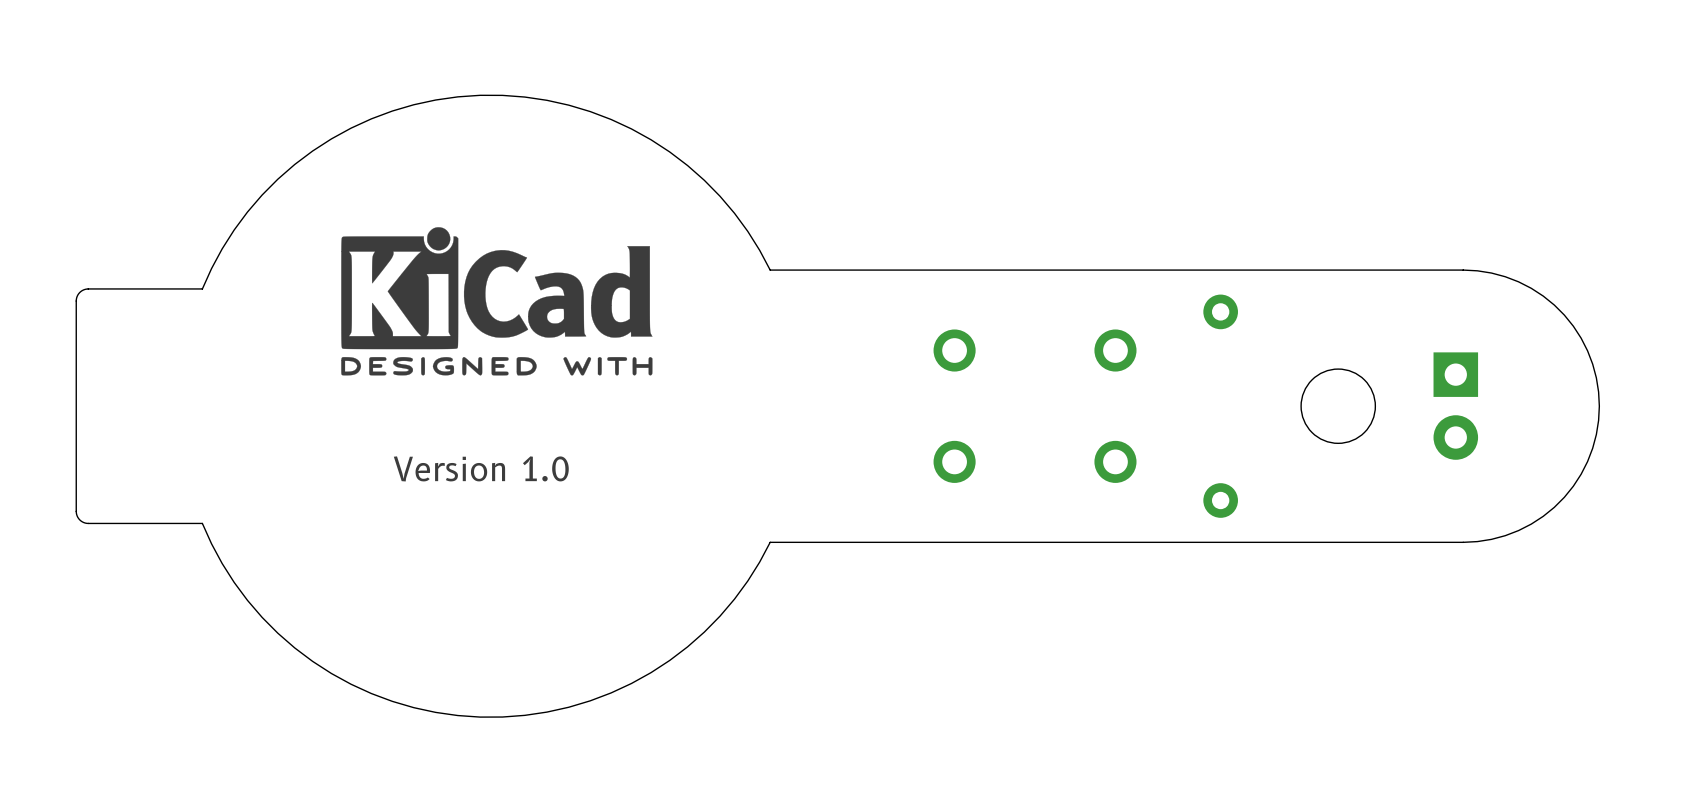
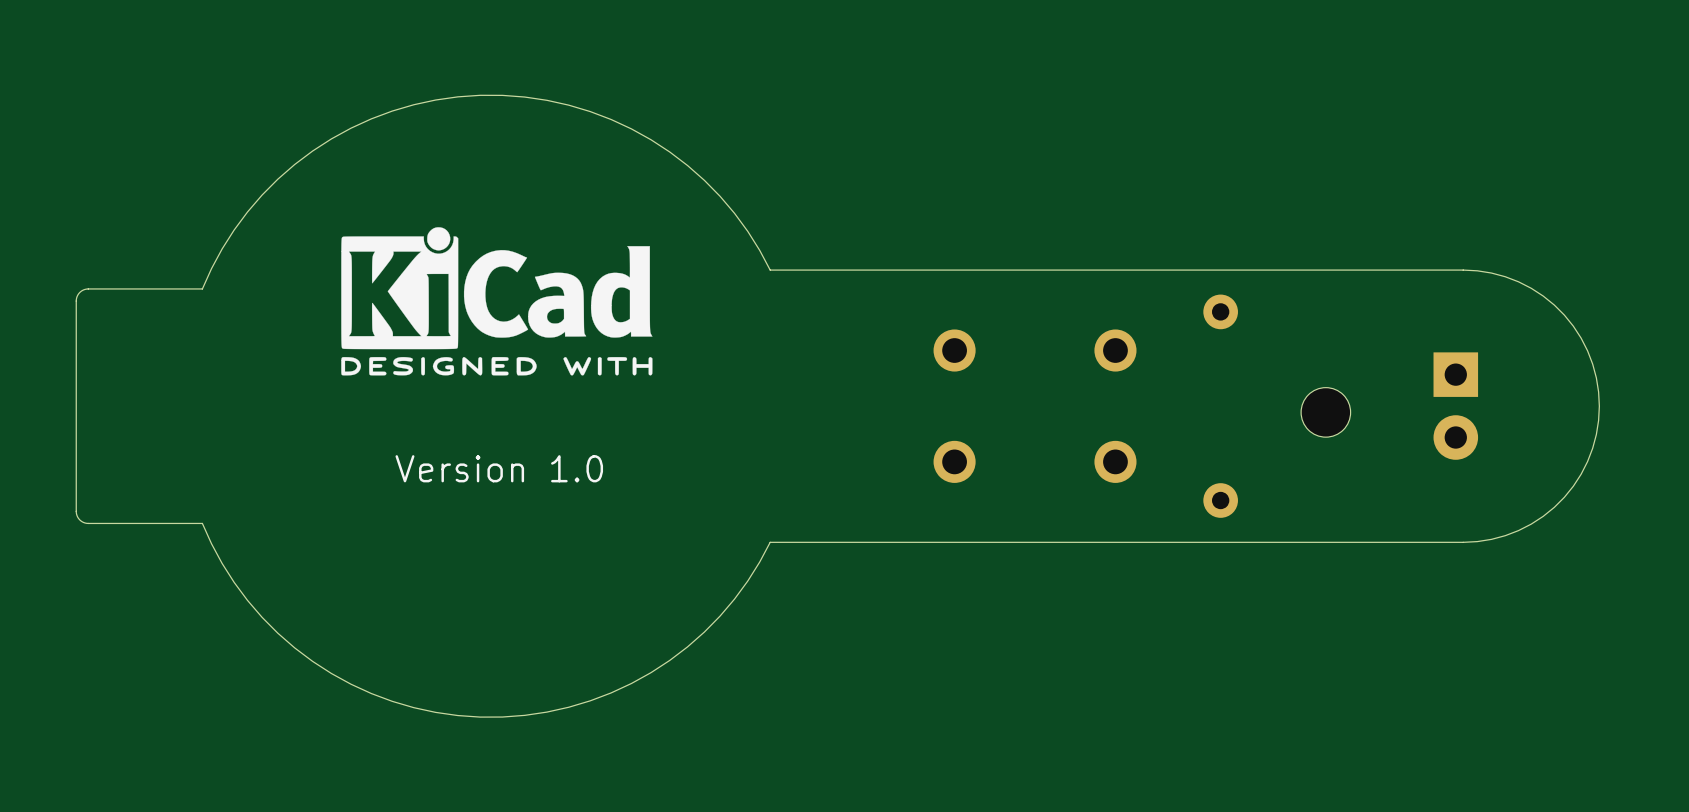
round board edge: [1300, 368, 1376, 444] -> none
part: none -> (1325, 412)

